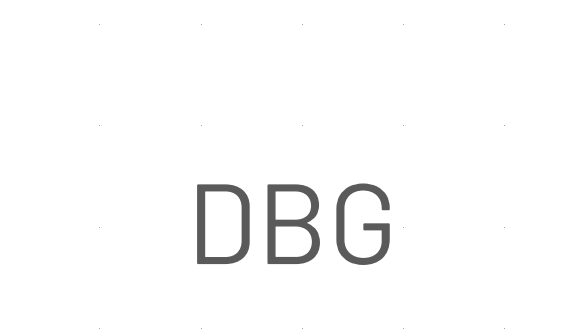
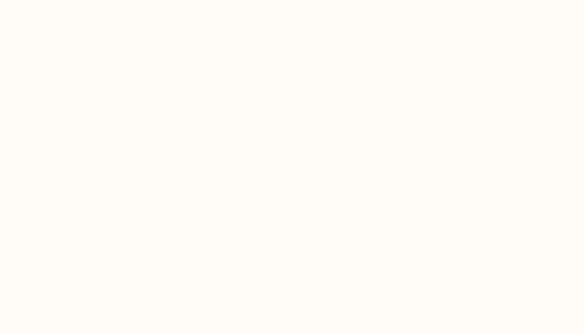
text: DBG (293, 224) -> none

